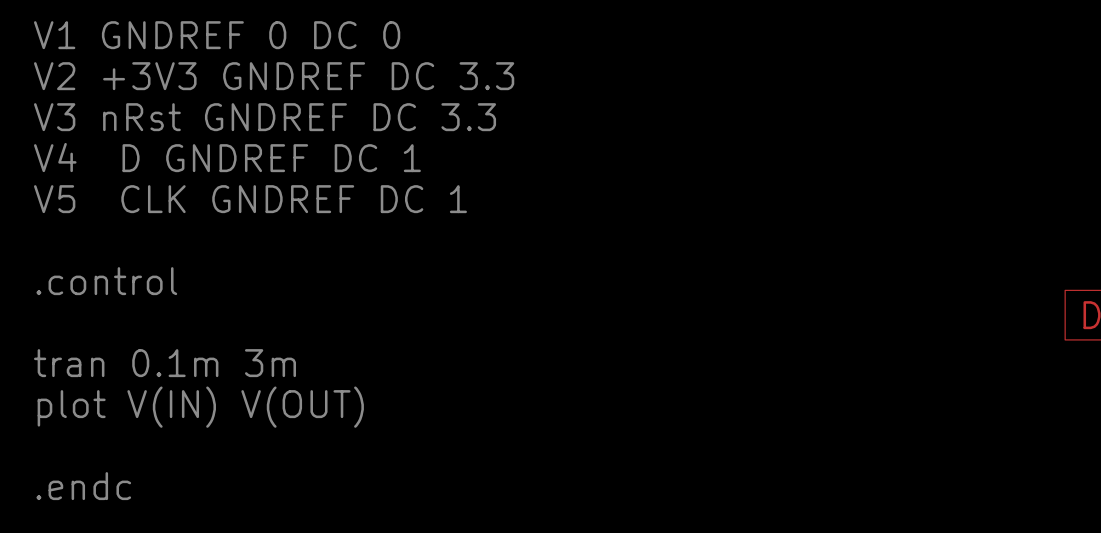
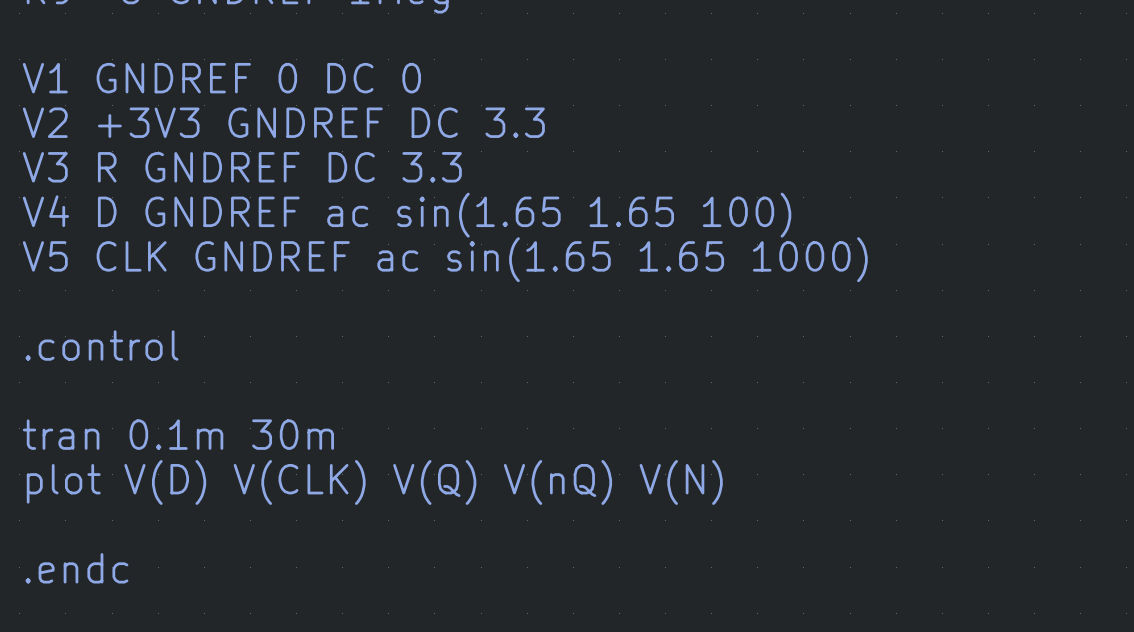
text: V3 nRst GNDREF DC 3.3 (265, 117) -> V3 R GNDREF DC 3.3 (242, 167)
text: V4 D GNDREF DC 1 (227, 157) -> V4 D GNDREF ac sin(1.65 1.65 100) (407, 215)
text: V5 CLK GNDREF DC 1 (250, 199) -> V5 CLK GNDREF ac sin(1.65 1.65 1000) (445, 259)
text: tran 0.1m 3m (165, 363) -> tran 0.1m 30m (178, 434)
text: plot V(IN) V(OUT) (200, 407) -> plot V(D) V(CLK) V(Q) V(nQ) V(N) (374, 482)

